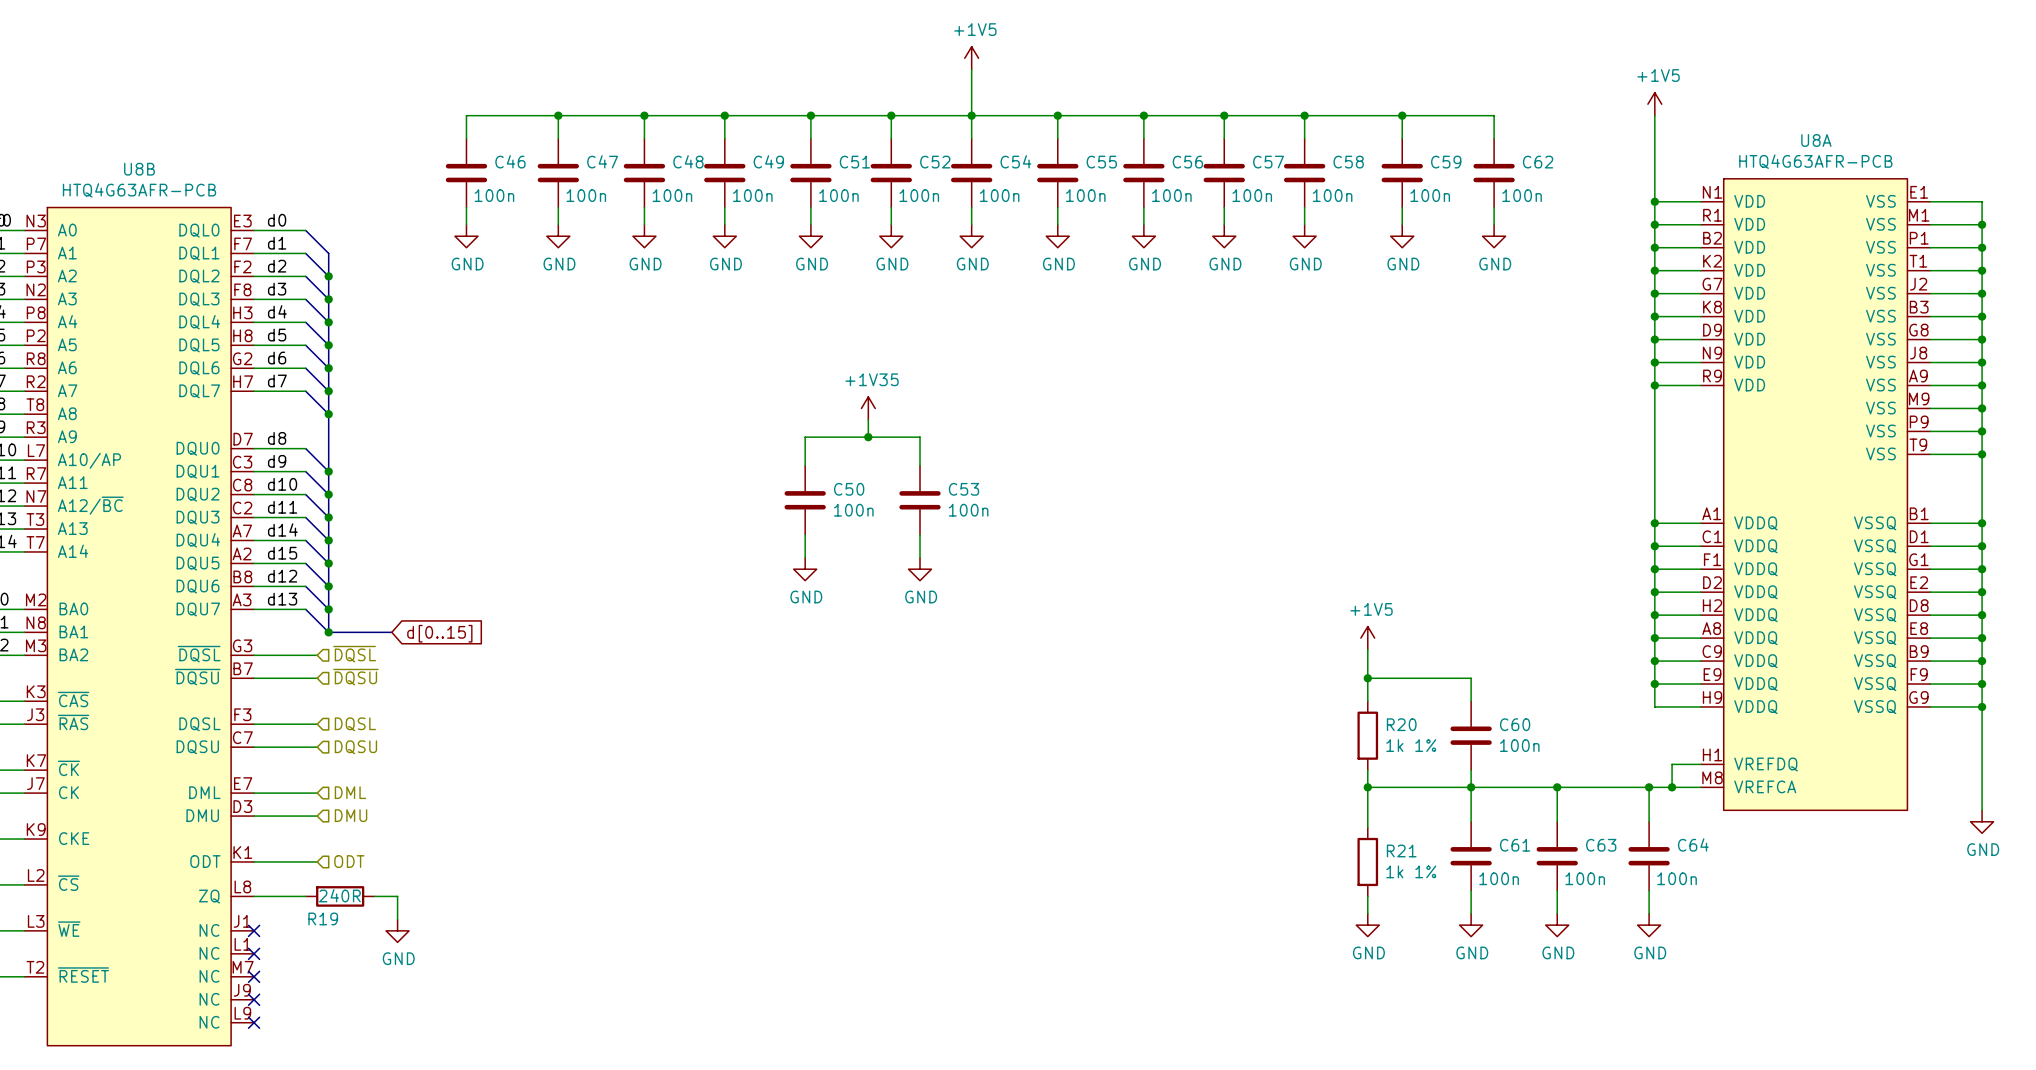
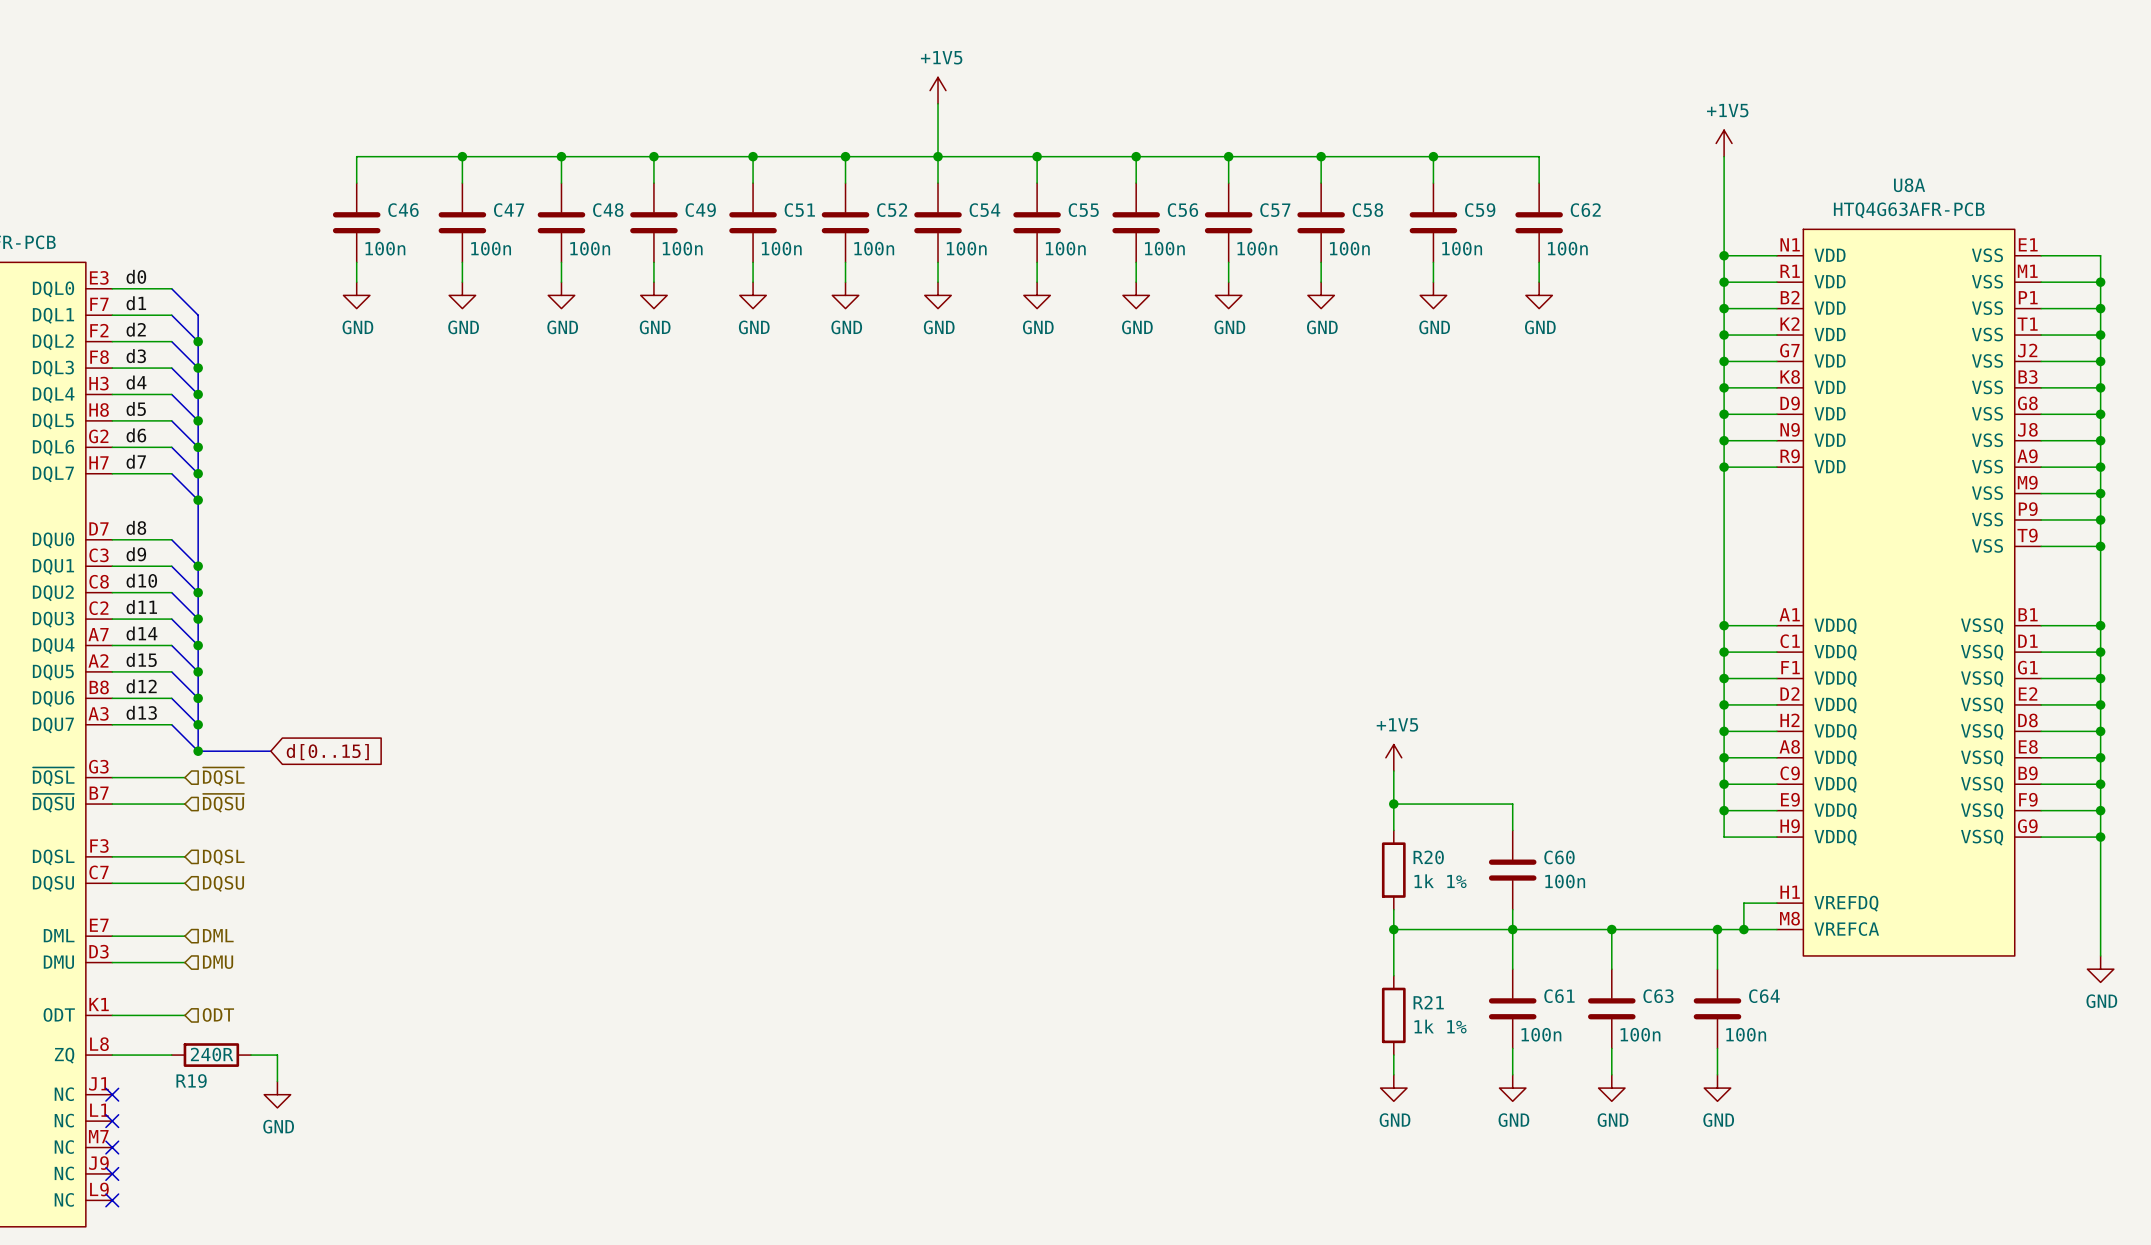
power symbol: +1V35 (868, 408) -> none
wire: (868, 419) (868, 437) -> none
junction: (868, 437) -> none
wire: (805, 465) (805, 437) (920, 437) (920, 465) -> none
C50: 100n (805, 500) -> none
C53: 100n (920, 500) -> none
wire: (805, 534) (805, 557) -> none
wire: (920, 534) (920, 557) -> none
power symbol: GND (805, 569) -> none
power symbol: GND (920, 569) -> none

